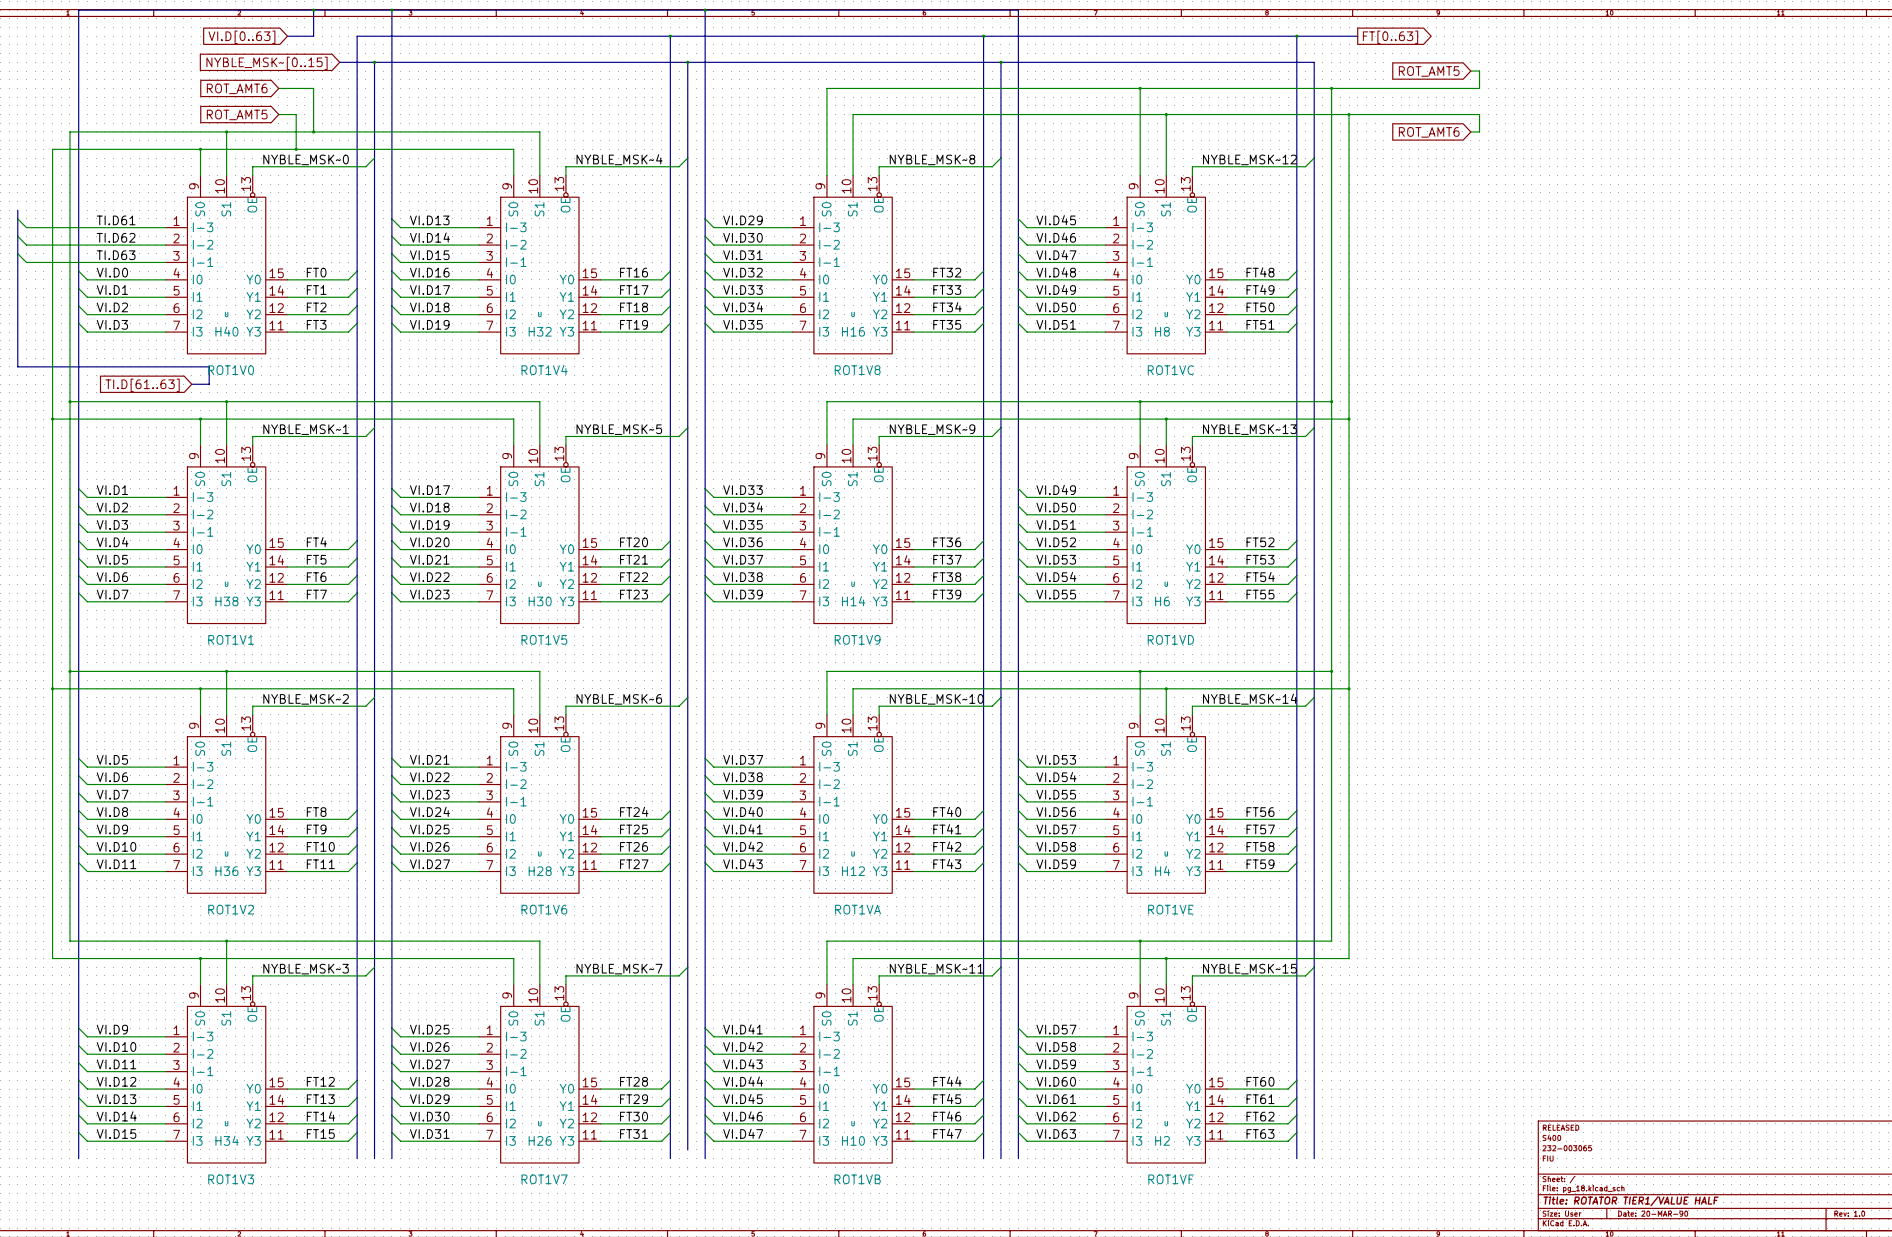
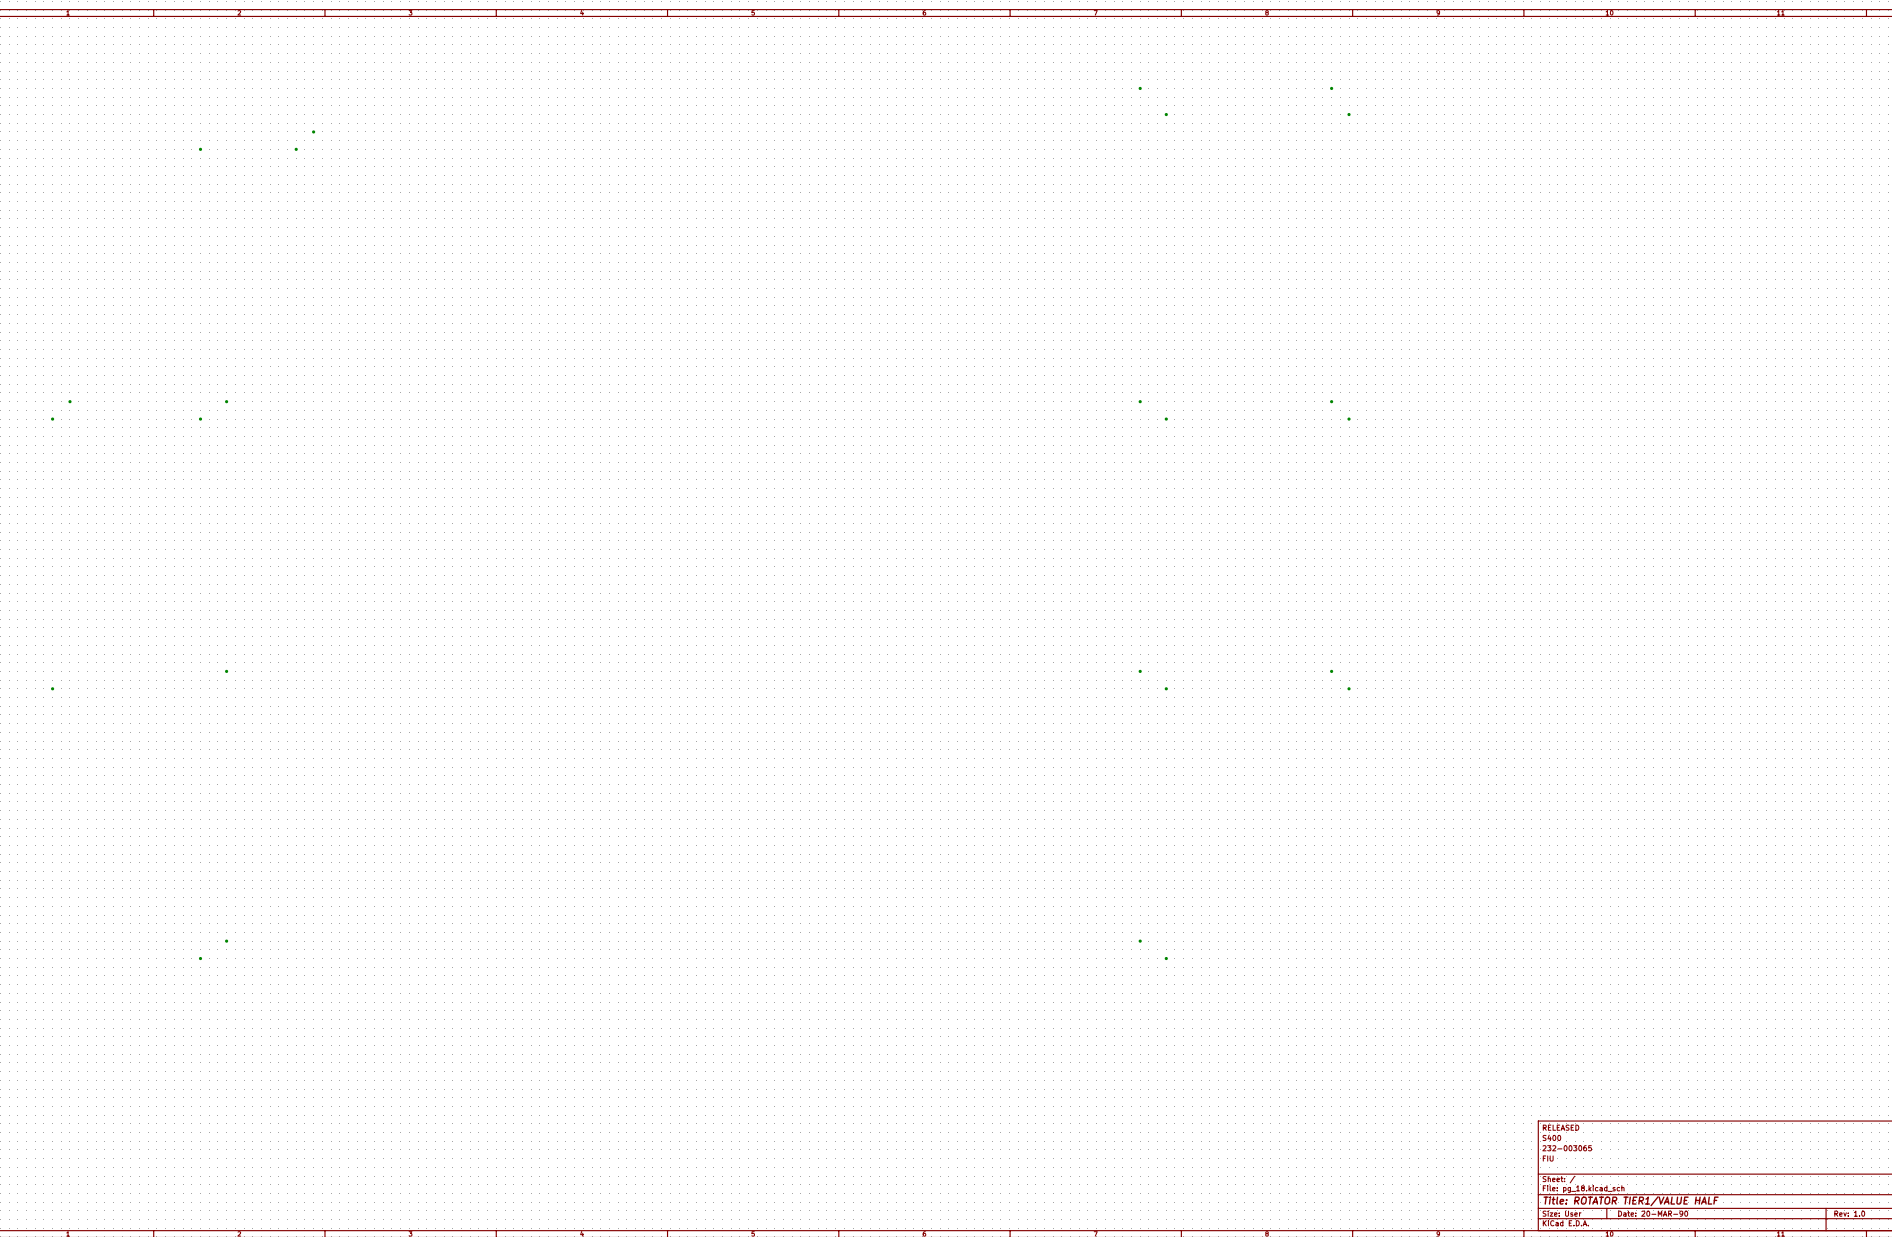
bus: (313, 10) (313, 36) (287, 36) -> none
junction: (313, 10) -> none
bus: (391, 10) (391, 1158) -> none
junction: (391, 10) -> none
bus: (705, 10) (705, 1158) -> none
junction: (705, 10) -> none
bus: (670, 36) (670, 1158) -> none
junction: (670, 36) -> none
bus: (983, 36) (983, 1158) -> none
junction: (983, 36) -> none
bus: (1296, 36) (1296, 1158) -> none
junction: (1296, 36) -> none
bus: (1357, 36) (357, 36) (357, 1158) -> none
global label: VI.D[0..63] (241, 37) -> none
global label: FT[0..63] (1390, 37) -> none
bus: (339, 62) (1314, 62) (1314, 1158) -> none
bus: (374, 62) (374, 1158) -> none
junction: (374, 62) -> none
bus: (687, 62) (687, 1149) -> none
junction: (687, 62) -> none
bus: (1000, 62) (1000, 1158) -> none
junction: (1000, 62) -> none
global label: NYBLE_MSK~[0..15] (267, 63) -> none
global label: ROT_AMT5 (1429, 71) -> none
wire: (1470, 71) (1479, 71) (1479, 88) (826, 88) (826, 175) -> none
global label: ROT_AMT6 (237, 88) -> none
wire: (278, 88) (313, 88) (313, 131) -> none
wire: (1140, 88) (1140, 175) -> none
wire: (1331, 88) (1331, 941) (826, 941) (826, 984) -> none
global label: ROT_AMT5 (237, 114) -> none
wire: (278, 114) (296, 114) (296, 149) -> none
wire: (1166, 114) (1166, 175) -> none
wire: (1349, 114) (1349, 958) (853, 958) (853, 984) -> none
wire: (226, 131) (226, 175) -> none
junction: (226, 131) -> none
wire: (1470, 131) (1479, 131) (1479, 114) (853, 114) (853, 175) -> none
global label: ROT_AMT6 (1429, 132) -> none
wire: (200, 149) (200, 175) -> none
wire: (374, 158) (365, 166) (252, 166) (252, 175) -> none
wire: (687, 158) (679, 166) (565, 166) (565, 175) -> none
wire: (1000, 158) (992, 166) (879, 166) (879, 175) -> none
wire: (1314, 158) (1305, 166) (1192, 166) (1192, 175) -> none
label: NYBLE_MSK~0 (306, 159) -> none
label: NYBLE_MSK~4 (619, 159) -> none
label: NYBLE_MSK~8 (932, 159) -> none
label: NYBLE_MSK~12 (1249, 159) -> none
wire: (513, 175) (513, 149) (52, 149) (52, 958) (513, 958) (513, 984) -> none
wire: (539, 175) (539, 131) (69, 131) (69, 941) (539, 941) (539, 984) -> none
bus: (17, 210) (17, 366) (209, 366) (209, 384) (191, 384) -> none
wire: (17, 218) (26, 227) (165, 227) -> none
wire: (391, 218) (400, 227) (478, 227) -> none
wire: (705, 218) (713, 227) (792, 227) -> none
wire: (1018, 218) (1027, 227) (1105, 227) -> none
label: TI.D61 (116, 220) -> none
label: VI.D13 (429, 220) -> none
label: VI.D29 (742, 220) -> none
label: VI.D45 (1056, 220) -> none
wire: (17, 236) (26, 245) (165, 245) -> none
wire: (391, 236) (400, 245) (478, 245) -> none
wire: (705, 236) (713, 245) (792, 245) -> none
wire: (1018, 236) (1027, 245) (1105, 245) -> none
label: TI.D62 (116, 237) -> none
label: VI.D14 (429, 237) -> none
label: VI.D30 (742, 237) -> none
label: VI.D46 (1056, 237) -> none
wire: (17, 253) (26, 262) (165, 262) -> none
wire: (391, 253) (400, 262) (478, 262) -> none
wire: (705, 253) (713, 262) (792, 262) -> none
wire: (1018, 253) (1027, 262) (1105, 262) -> none
label: TI.D63 (116, 255) -> none
label: VI.D15 (429, 255) -> none
label: VI.D31 (742, 255) -> none
label: VI.D47 (1056, 255) -> none
part: (226, 264) -> none
part: (539, 264) -> none
part: (853, 264) -> none
part: (1166, 264) -> none
wire: (78, 271) (87, 279) (165, 279) -> none
wire: (357, 271) (348, 279) (287, 279) -> none
wire: (391, 271) (400, 279) (478, 279) -> none
wire: (670, 271) (661, 279) (600, 279) -> none
wire: (705, 271) (713, 279) (792, 279) -> none
wire: (983, 271) (974, 279) (913, 279) -> none
wire: (1018, 271) (1027, 279) (1105, 279) -> none
wire: (1296, 271) (1288, 279) (1227, 279) -> none
label: VI.D0 (112, 272) -> none
label: FT0 (316, 272) -> none
label: VI.D16 (429, 272) -> none
label: FT16 (634, 272) -> none
label: VI.D32 (742, 272) -> none
label: FT32 (947, 272) -> none
label: VI.D48 (1056, 272) -> none
label: FT48 (1260, 272) -> none
wire: (78, 288) (87, 297) (165, 297) -> none
wire: (357, 288) (348, 297) (287, 297) -> none
wire: (391, 288) (400, 297) (478, 297) -> none
wire: (670, 288) (661, 297) (600, 297) -> none
wire: (705, 288) (713, 297) (792, 297) -> none
wire: (983, 288) (974, 297) (913, 297) -> none
wire: (1018, 288) (1027, 297) (1105, 297) -> none
wire: (1296, 288) (1288, 297) (1227, 297) -> none
label: VI.D49 (1056, 289) -> none
label: FT49 (1260, 289) -> none
label: VI.D1 (112, 290) -> none
label: FT1 (316, 290) -> none
label: VI.D17 (429, 290) -> none
label: FT17 (634, 290) -> none
label: VI.D33 (742, 290) -> none
label: FT33 (947, 290) -> none
wire: (78, 305) (87, 314) (165, 314) -> none
wire: (357, 305) (348, 314) (287, 314) -> none
wire: (391, 305) (400, 314) (478, 314) -> none
wire: (670, 305) (661, 314) (600, 314) -> none
wire: (705, 305) (713, 314) (792, 314) -> none
wire: (983, 305) (974, 314) (913, 314) -> none
wire: (1018, 305) (1027, 314) (1105, 314) -> none
wire: (1296, 305) (1288, 314) (1227, 314) -> none
label: VI.D2 (112, 307) -> none
label: FT2 (316, 307) -> none
label: VI.D18 (429, 307) -> none
label: FT18 (634, 307) -> none
label: VI.D34 (743, 307) -> none
label: FT34 (947, 307) -> none
label: VI.D50 (1056, 307) -> none
label: FT50 (1260, 307) -> none
wire: (78, 323) (87, 332) (165, 332) -> none
wire: (357, 323) (348, 332) (287, 332) -> none
wire: (391, 323) (400, 332) (478, 332) -> none
wire: (670, 323) (661, 332) (600, 332) -> none
wire: (705, 323) (713, 332) (792, 332) -> none
wire: (983, 323) (974, 332) (913, 332) -> none
wire: (1018, 323) (1027, 332) (1105, 332) -> none
wire: (1296, 323) (1288, 332) (1227, 332) -> none
label: VI.D3 (112, 324) -> none
label: FT3 (316, 324) -> none
label: VI.D19 (429, 324) -> none
label: FT19 (634, 324) -> none
label: VI.D35 (742, 324) -> none
label: FT35 (947, 324) -> none
label: VI.D51 (1056, 324) -> none
label: FT51 (1260, 324) -> none
global label: TI.D[61..63] (142, 385) -> none
wire: (69, 401) (539, 401) (539, 445) -> none
wire: (226, 401) (226, 445) -> none
wire: (1140, 401) (1140, 445) -> none
wire: (1331, 401) (826, 401) (826, 445) -> none
wire: (52, 419) (513, 419) (513, 445) -> none
wire: (200, 419) (200, 445) -> none
wire: (1166, 419) (1166, 445) -> none
wire: (1349, 419) (853, 419) (853, 445) -> none
wire: (374, 427) (365, 436) (252, 436) (252, 445) -> none
wire: (687, 427) (679, 436) (565, 436) (565, 445) -> none
wire: (1000, 427) (992, 436) (879, 436) (879, 445) -> none
wire: (1314, 427) (1305, 436) (1192, 436) (1192, 445) -> none
label: NYBLE_MSK~1 (306, 429) -> none
label: NYBLE_MSK~5 (619, 429) -> none
label: NYBLE_MSK~9 (932, 429) -> none
label: NYBLE_MSK~13 (1249, 429) -> none
wire: (78, 488) (87, 497) (165, 497) -> none
wire: (391, 488) (400, 497) (478, 497) -> none
wire: (705, 488) (713, 497) (792, 497) -> none
wire: (1018, 488) (1027, 497) (1105, 497) -> none
label: VI.D49 (1056, 489) -> none
label: VI.D1 (112, 490) -> none
label: VI.D17 (429, 490) -> none
label: VI.D33 (742, 490) -> none
wire: (78, 506) (87, 514) (165, 514) -> none
wire: (391, 506) (400, 514) (478, 514) -> none
wire: (705, 506) (713, 514) (792, 514) -> none
wire: (1018, 506) (1027, 514) (1105, 514) -> none
label: VI.D2 (112, 507) -> none
label: VI.D18 (429, 507) -> none
label: VI.D34 (743, 507) -> none
label: VI.D50 (1056, 507) -> none
wire: (78, 523) (87, 532) (165, 532) -> none
wire: (391, 523) (400, 532) (478, 532) -> none
wire: (705, 523) (713, 532) (792, 532) -> none
wire: (1018, 523) (1027, 532) (1105, 532) -> none
label: VI.D3 (112, 524) -> none
label: VI.D19 (429, 524) -> none
label: VI.D35 (742, 524) -> none
label: VI.D51 (1056, 524) -> none
part: (226, 534) -> none
part: (539, 534) -> none
part: (853, 534) -> none
part: (1166, 534) -> none
wire: (78, 540) (87, 549) (165, 549) -> none
wire: (357, 540) (348, 549) (287, 549) -> none
wire: (391, 540) (400, 549) (478, 549) -> none
wire: (670, 540) (661, 549) (600, 549) -> none
wire: (705, 540) (713, 549) (792, 549) -> none
wire: (983, 540) (974, 549) (913, 549) -> none
wire: (1018, 540) (1027, 549) (1105, 549) -> none
wire: (1296, 540) (1288, 549) (1227, 549) -> none
label: VI.D4 (112, 542) -> none
label: FT4 (316, 542) -> none
label: VI.D20 (429, 542) -> none
label: FT20 (634, 542) -> none
label: VI.D36 (742, 542) -> none
label: FT36 (947, 542) -> none
label: VI.D52 (1056, 542) -> none
label: FT52 (1260, 542) -> none
wire: (78, 558) (87, 566) (165, 566) -> none
wire: (357, 558) (348, 566) (287, 566) -> none
wire: (391, 558) (400, 566) (478, 566) -> none
wire: (670, 558) (661, 566) (600, 566) -> none
wire: (705, 558) (713, 566) (792, 566) -> none
wire: (983, 558) (974, 566) (913, 566) -> none
wire: (1018, 558) (1027, 566) (1105, 566) -> none
wire: (1296, 558) (1288, 566) (1227, 566) -> none
label: VI.D5 (112, 559) -> none
label: FT5 (316, 559) -> none
label: VI.D21 (429, 559) -> none
label: FT21 (634, 559) -> none
label: VI.D37 (743, 559) -> none
label: FT37 (947, 559) -> none
label: VI.D53 (1056, 559) -> none
label: FT53 (1260, 559) -> none
wire: (78, 575) (87, 584) (165, 584) -> none
wire: (357, 575) (348, 584) (287, 584) -> none
wire: (391, 575) (400, 584) (478, 584) -> none
wire: (670, 575) (661, 584) (600, 584) -> none
wire: (705, 575) (713, 584) (792, 584) -> none
wire: (983, 575) (974, 584) (913, 584) -> none
wire: (1018, 575) (1027, 584) (1105, 584) -> none
wire: (1296, 575) (1288, 584) (1227, 584) -> none
label: VI.D54 (1056, 576) -> none
label: FT54 (1260, 576) -> none
label: VI.D6 (112, 577) -> none
label: FT6 (316, 577) -> none
label: VI.D22 (429, 577) -> none
label: FT22 (634, 577) -> none
label: VI.D38 (742, 577) -> none
label: FT38 (947, 577) -> none
wire: (78, 593) (87, 601) (165, 601) -> none
wire: (357, 593) (348, 601) (287, 601) -> none
wire: (391, 593) (400, 601) (478, 601) -> none
wire: (670, 593) (661, 601) (600, 601) -> none
wire: (705, 593) (713, 601) (792, 601) -> none
wire: (983, 593) (974, 601) (913, 601) -> none
wire: (1018, 593) (1027, 601) (1105, 601) -> none
wire: (1296, 593) (1288, 601) (1227, 601) -> none
label: VI.D7 (112, 594) -> none
label: FT7 (316, 594) -> none
label: VI.D23 (429, 594) -> none
label: FT23 (634, 594) -> none
label: VI.D39 (742, 594) -> none
label: FT39 (947, 594) -> none
label: VI.D55 (1056, 594) -> none
label: FT55 (1260, 594) -> none
wire: (69, 671) (539, 671) (539, 714) -> none
junction: (69, 671) -> none
wire: (226, 671) (226, 714) -> none
wire: (1140, 671) (1140, 714) -> none
wire: (1331, 671) (826, 671) (826, 714) -> none
wire: (52, 688) (513, 688) (513, 714) -> none
wire: (200, 688) (200, 714) -> none
junction: (200, 688) -> none
wire: (1166, 688) (1166, 714) -> none
wire: (1349, 688) (853, 688) (853, 714) -> none
wire: (374, 697) (365, 706) (252, 706) (252, 714) -> none
wire: (687, 697) (679, 706) (565, 706) (565, 714) -> none
wire: (1000, 697) (992, 706) (879, 706) (879, 714) -> none
wire: (1314, 697) (1305, 706) (1192, 706) (1192, 714) -> none
label: NYBLE_MSK~2 (306, 699) -> none
label: NYBLE_MSK~6 (619, 699) -> none
label: NYBLE_MSK~10 (936, 699) -> none
label: NYBLE_MSK~14 (1250, 699) -> none
wire: (78, 758) (87, 767) (165, 767) -> none
wire: (391, 758) (400, 767) (478, 767) -> none
wire: (705, 758) (713, 767) (792, 767) -> none
wire: (1018, 758) (1027, 767) (1105, 767) -> none
label: VI.D5 (112, 759) -> none
label: VI.D21 (429, 759) -> none
label: VI.D37 (743, 759) -> none
label: VI.D53 (1056, 759) -> none
wire: (78, 775) (87, 784) (165, 784) -> none
wire: (391, 775) (400, 784) (478, 784) -> none
wire: (705, 775) (713, 784) (792, 784) -> none
wire: (1018, 775) (1027, 784) (1105, 784) -> none
label: VI.D6 (112, 777) -> none
label: VI.D22 (429, 777) -> none
label: VI.D38 (742, 777) -> none
label: VI.D54 (1056, 777) -> none
wire: (78, 793) (87, 801) (165, 801) -> none
wire: (391, 793) (400, 801) (478, 801) -> none
wire: (705, 793) (713, 801) (792, 801) -> none
wire: (1018, 793) (1027, 801) (1105, 801) -> none
label: VI.D7 (112, 794) -> none
label: VI.D23 (429, 794) -> none
label: VI.D39 (742, 794) -> none
label: VI.D55 (1056, 794) -> none
part: (226, 804) -> none
part: (539, 804) -> none
part: (853, 804) -> none
part: (1166, 804) -> none
wire: (78, 810) (87, 819) (165, 819) -> none
wire: (357, 810) (348, 819) (287, 819) -> none
wire: (391, 810) (400, 819) (478, 819) -> none
wire: (670, 810) (661, 819) (600, 819) -> none
wire: (705, 810) (713, 819) (792, 819) -> none
wire: (983, 810) (974, 819) (913, 819) -> none
wire: (1018, 810) (1027, 819) (1105, 819) -> none
wire: (1296, 810) (1288, 819) (1227, 819) -> none
label: VI.D24 (429, 811) -> none
label: FT24 (634, 811) -> none
label: VI.D40 (742, 811) -> none
label: FT40 (947, 811) -> none
label: VI.D8 (112, 812) -> none
label: FT8 (316, 812) -> none
label: VI.D56 (1056, 812) -> none
label: FT56 (1260, 812) -> none
wire: (78, 828) (87, 836) (165, 836) -> none
wire: (357, 828) (348, 836) (287, 836) -> none
wire: (391, 828) (400, 836) (478, 836) -> none
wire: (670, 828) (661, 836) (600, 836) -> none
wire: (705, 828) (713, 836) (792, 836) -> none
wire: (983, 828) (974, 836) (913, 836) -> none
wire: (1018, 828) (1027, 836) (1105, 836) -> none
wire: (1296, 828) (1288, 836) (1227, 836) -> none
label: VI.D9 (112, 829) -> none
label: FT9 (316, 829) -> none
label: VI.D25 (429, 829) -> none
label: FT25 (634, 829) -> none
label: VI.D41 (742, 829) -> none
label: FT41 (947, 829) -> none
label: VI.D57 (1056, 829) -> none
label: FT57 (1260, 829) -> none
wire: (78, 845) (87, 854) (165, 854) -> none
wire: (357, 845) (348, 854) (287, 854) -> none
wire: (391, 845) (400, 854) (478, 854) -> none
wire: (670, 845) (661, 854) (600, 854) -> none
wire: (705, 845) (713, 854) (792, 854) -> none
wire: (983, 845) (974, 854) (913, 854) -> none
wire: (1018, 845) (1027, 854) (1105, 854) -> none
wire: (1296, 845) (1288, 854) (1227, 854) -> none
label: VI.D10 (116, 846) -> none
label: FT10 (320, 846) -> none
label: VI.D26 (429, 846) -> none
label: FT26 (634, 846) -> none
label: VI.D42 (742, 846) -> none
label: FT42 (947, 846) -> none
label: VI.D58 (1056, 846) -> none
label: FT58 (1260, 846) -> none
wire: (78, 862) (87, 871) (165, 871) -> none
wire: (357, 862) (348, 871) (287, 871) -> none
wire: (391, 862) (400, 871) (478, 871) -> none
wire: (670, 862) (661, 871) (600, 871) -> none
wire: (705, 862) (713, 871) (792, 871) -> none
wire: (983, 862) (974, 871) (913, 871) -> none
wire: (1018, 862) (1027, 871) (1105, 871) -> none
wire: (1296, 862) (1288, 871) (1227, 871) -> none
label: VI.D11 (116, 864) -> none
label: FT11 (320, 864) -> none
label: VI.D27 (429, 864) -> none
label: FT27 (634, 864) -> none
label: VI.D43 (742, 864) -> none
label: FT43 (947, 864) -> none
label: VI.D59 (1056, 864) -> none
label: FT59 (1260, 864) -> none
wire: (226, 941) (226, 984) -> none
wire: (1140, 941) (1140, 984) -> none
wire: (200, 958) (200, 984) -> none
wire: (1166, 958) (1166, 984) -> none
wire: (374, 967) (365, 975) (252, 975) (252, 984) -> none
wire: (687, 967) (679, 975) (565, 975) (565, 984) -> none
wire: (1000, 967) (992, 975) (879, 975) (879, 984) -> none
wire: (1314, 967) (1305, 975) (1192, 975) (1192, 984) -> none
label: NYBLE_MSK~3 (306, 969) -> none
label: NYBLE_MSK~7 (619, 969) -> none
label: NYBLE_MSK~11 (936, 969) -> none
label: NYBLE_MSK~15 (1249, 969) -> none
wire: (78, 1028) (87, 1036) (165, 1036) -> none
wire: (391, 1028) (400, 1036) (478, 1036) -> none
wire: (705, 1028) (713, 1036) (792, 1036) -> none
wire: (1018, 1028) (1027, 1036) (1105, 1036) -> none
label: VI.D9 (112, 1029) -> none
label: VI.D25 (429, 1029) -> none
label: VI.D41 (742, 1029) -> none
label: VI.D57 (1056, 1029) -> none
wire: (78, 1045) (87, 1054) (165, 1054) -> none
wire: (391, 1045) (400, 1054) (478, 1054) -> none
wire: (705, 1045) (713, 1054) (792, 1054) -> none
wire: (1018, 1045) (1027, 1054) (1105, 1054) -> none
label: VI.D10 (116, 1046) -> none
label: VI.D26 (429, 1046) -> none
label: VI.D42 (742, 1046) -> none
label: VI.D58 (1056, 1046) -> none
wire: (78, 1062) (87, 1071) (165, 1071) -> none
wire: (391, 1062) (400, 1071) (478, 1071) -> none
wire: (705, 1062) (713, 1071) (792, 1071) -> none
wire: (1018, 1062) (1027, 1071) (1105, 1071) -> none
label: VI.D11 (116, 1064) -> none
label: VI.D27 (429, 1064) -> none
label: VI.D43 (742, 1064) -> none
label: VI.D59 (1056, 1064) -> none
part: (226, 1073) -> none
part: (539, 1073) -> none
part: (853, 1073) -> none
part: (1166, 1073) -> none
wire: (78, 1080) (87, 1089) (165, 1089) -> none
wire: (357, 1080) (348, 1089) (287, 1089) -> none
wire: (391, 1080) (400, 1089) (478, 1089) -> none
wire: (670, 1080) (661, 1089) (600, 1089) -> none
wire: (705, 1080) (713, 1089) (792, 1089) -> none
wire: (983, 1080) (974, 1089) (913, 1089) -> none
wire: (1018, 1080) (1027, 1089) (1105, 1089) -> none
wire: (1296, 1080) (1288, 1089) (1227, 1089) -> none
label: VI.D12 (116, 1081) -> none
label: FT12 (320, 1081) -> none
label: VI.D28 (429, 1081) -> none
label: FT28 (634, 1081) -> none
label: VI.D44 (743, 1081) -> none
label: FT44 (947, 1081) -> none
label: VI.D60 (1056, 1081) -> none
label: FT60 (1260, 1081) -> none
wire: (78, 1097) (87, 1106) (165, 1106) -> none
wire: (357, 1097) (348, 1106) (287, 1106) -> none
wire: (391, 1097) (400, 1106) (478, 1106) -> none
wire: (670, 1097) (661, 1106) (600, 1106) -> none
wire: (705, 1097) (713, 1106) (792, 1106) -> none
wire: (983, 1097) (974, 1106) (913, 1106) -> none
wire: (1018, 1097) (1027, 1106) (1105, 1106) -> none
wire: (1296, 1097) (1288, 1106) (1227, 1106) -> none
label: VI.D45 (742, 1098) -> none
label: FT45 (947, 1098) -> none
label: VI.D13 (116, 1099) -> none
label: FT13 (320, 1099) -> none
label: VI.D29 (429, 1099) -> none
label: FT29 (634, 1099) -> none
label: VI.D61 (1056, 1099) -> none
label: FT61 (1260, 1099) -> none
wire: (78, 1115) (87, 1123) (165, 1123) -> none
wire: (357, 1115) (348, 1123) (287, 1123) -> none
wire: (391, 1115) (400, 1123) (478, 1123) -> none
wire: (670, 1115) (661, 1123) (600, 1123) -> none
wire: (705, 1115) (713, 1123) (792, 1123) -> none
wire: (983, 1115) (974, 1123) (913, 1123) -> none
wire: (1018, 1115) (1027, 1123) (1105, 1123) -> none
wire: (1296, 1115) (1288, 1123) (1227, 1123) -> none
label: VI.D14 (116, 1116) -> none
label: FT14 (321, 1116) -> none
label: VI.D30 (429, 1116) -> none
label: FT30 (634, 1116) -> none
label: VI.D46 (742, 1116) -> none
label: FT46 (947, 1116) -> none
label: VI.D62 (1056, 1116) -> none
label: FT62 (1260, 1116) -> none
wire: (78, 1132) (87, 1141) (165, 1141) -> none
wire: (357, 1132) (348, 1141) (287, 1141) -> none
wire: (391, 1132) (400, 1141) (478, 1141) -> none
wire: (670, 1132) (661, 1141) (600, 1141) -> none
wire: (705, 1132) (713, 1141) (792, 1141) -> none
wire: (983, 1132) (974, 1141) (913, 1141) -> none
wire: (1018, 1132) (1027, 1141) (1105, 1141) -> none
wire: (1296, 1132) (1288, 1141) (1227, 1141) -> none
label: VI.D47 (743, 1133) -> none
label: FT47 (947, 1133) -> none
label: VI.D15 (116, 1134) -> none
label: FT15 (320, 1134) -> none
label: VI.D31 (429, 1134) -> none
label: FT31 (634, 1134) -> none
label: VI.D63 (1056, 1134) -> none
label: FT63 (1260, 1134) -> none
bus: (78, 1158) (78, 10) (1018, 10) (1018, 1158) -> none

